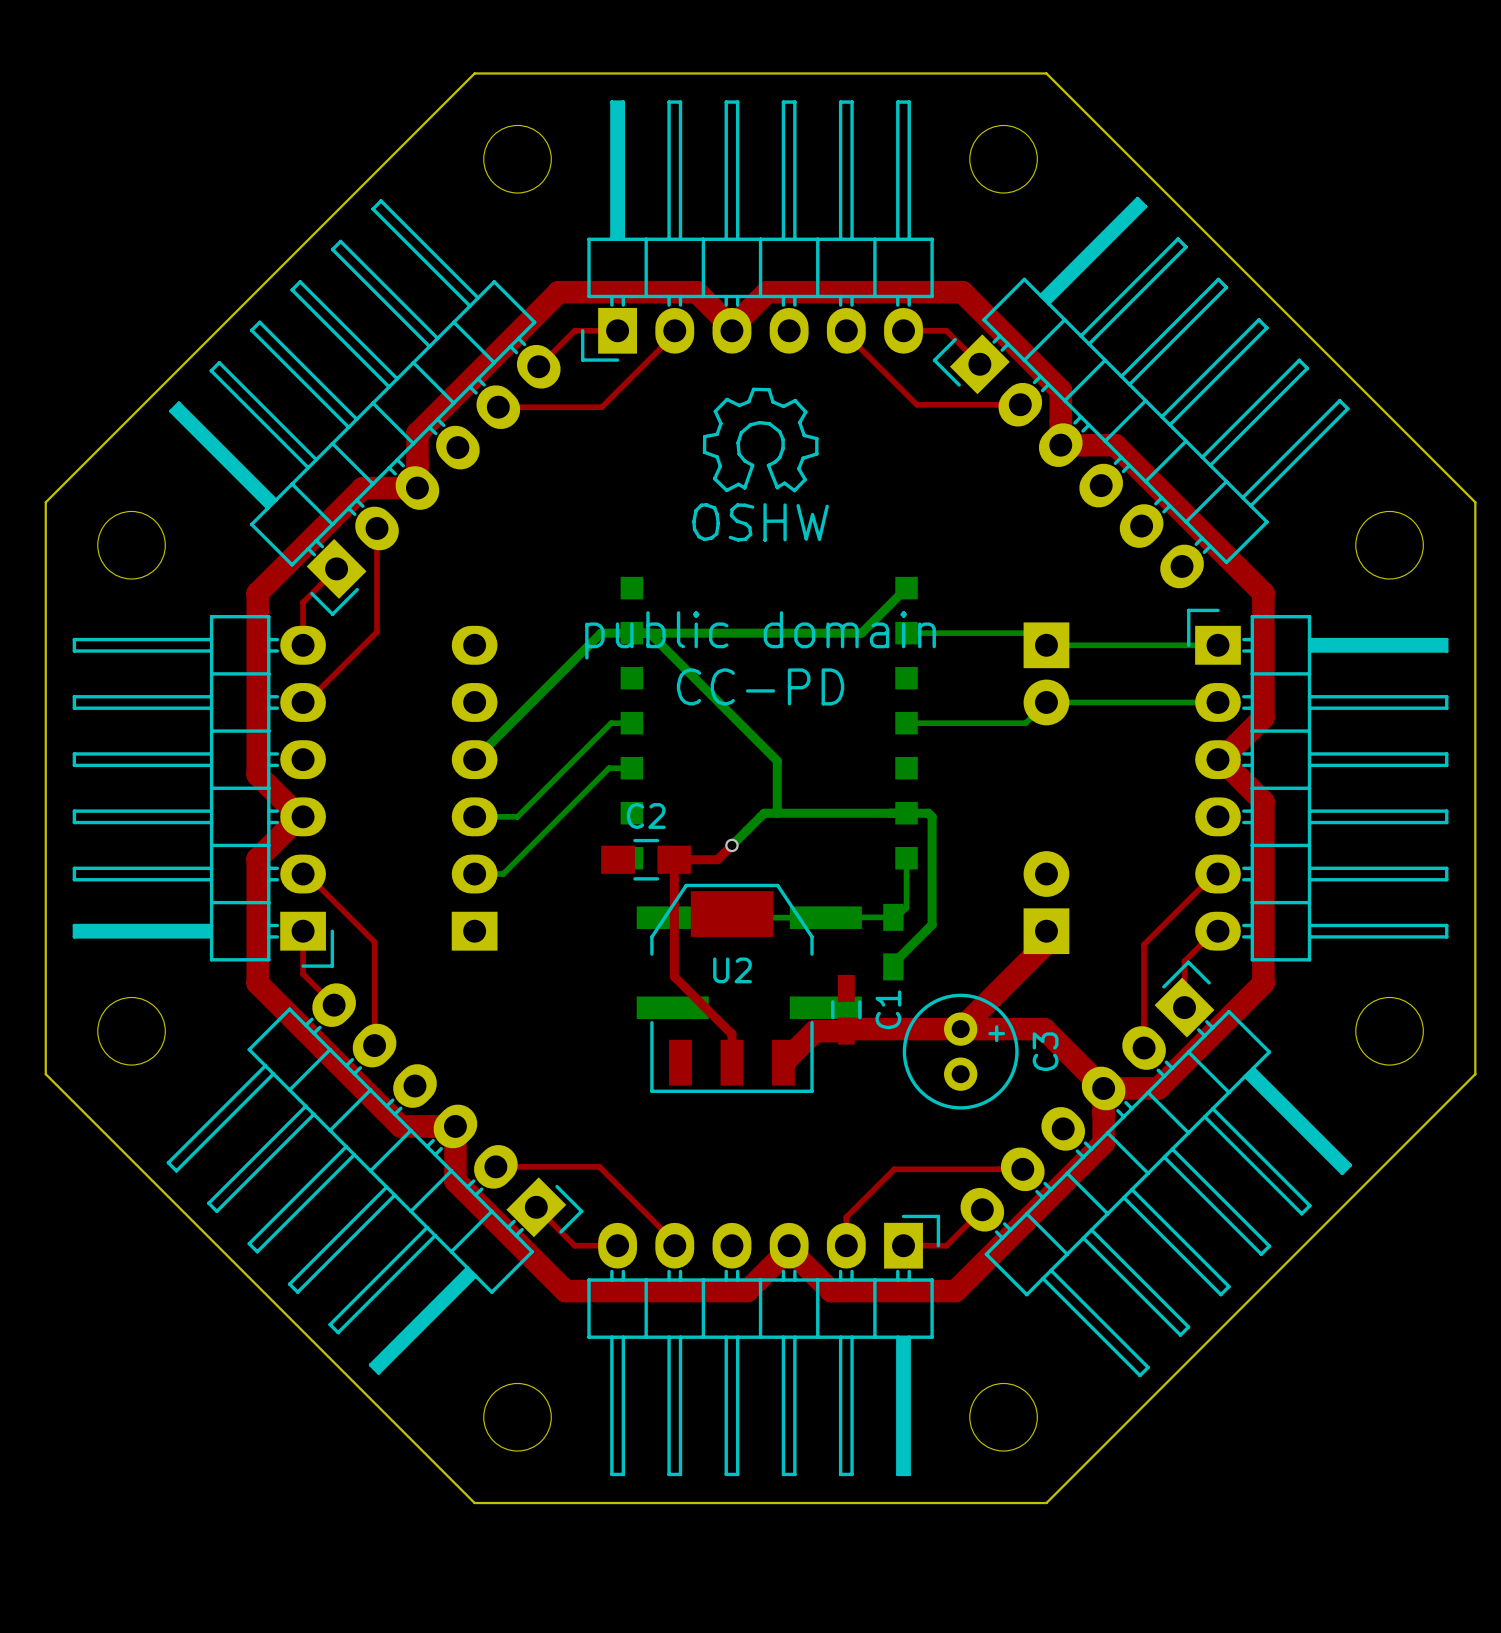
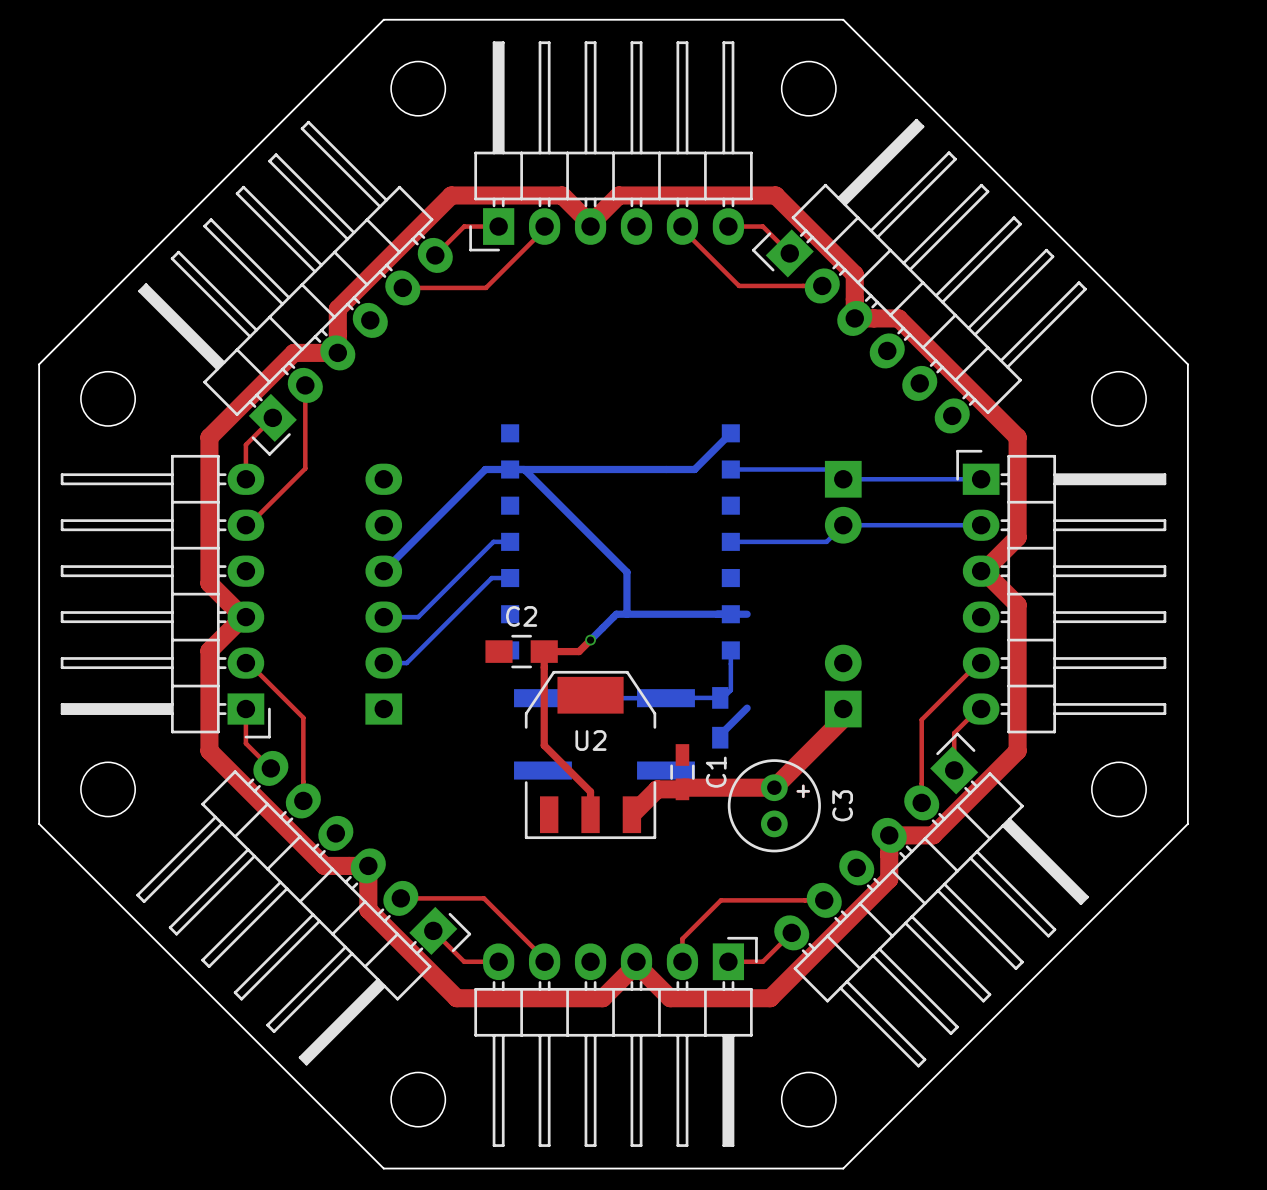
drawing: [692, 387, 829, 542] -> none
text: public domain (760, 635) -> none
text: CC-PD (760, 686) -> none
bottom track: (926, 813) (932, 816) (932, 924) (926, 930) -> none
top track: (960, 1029) (1044, 1029) (1103, 1088) -> none

